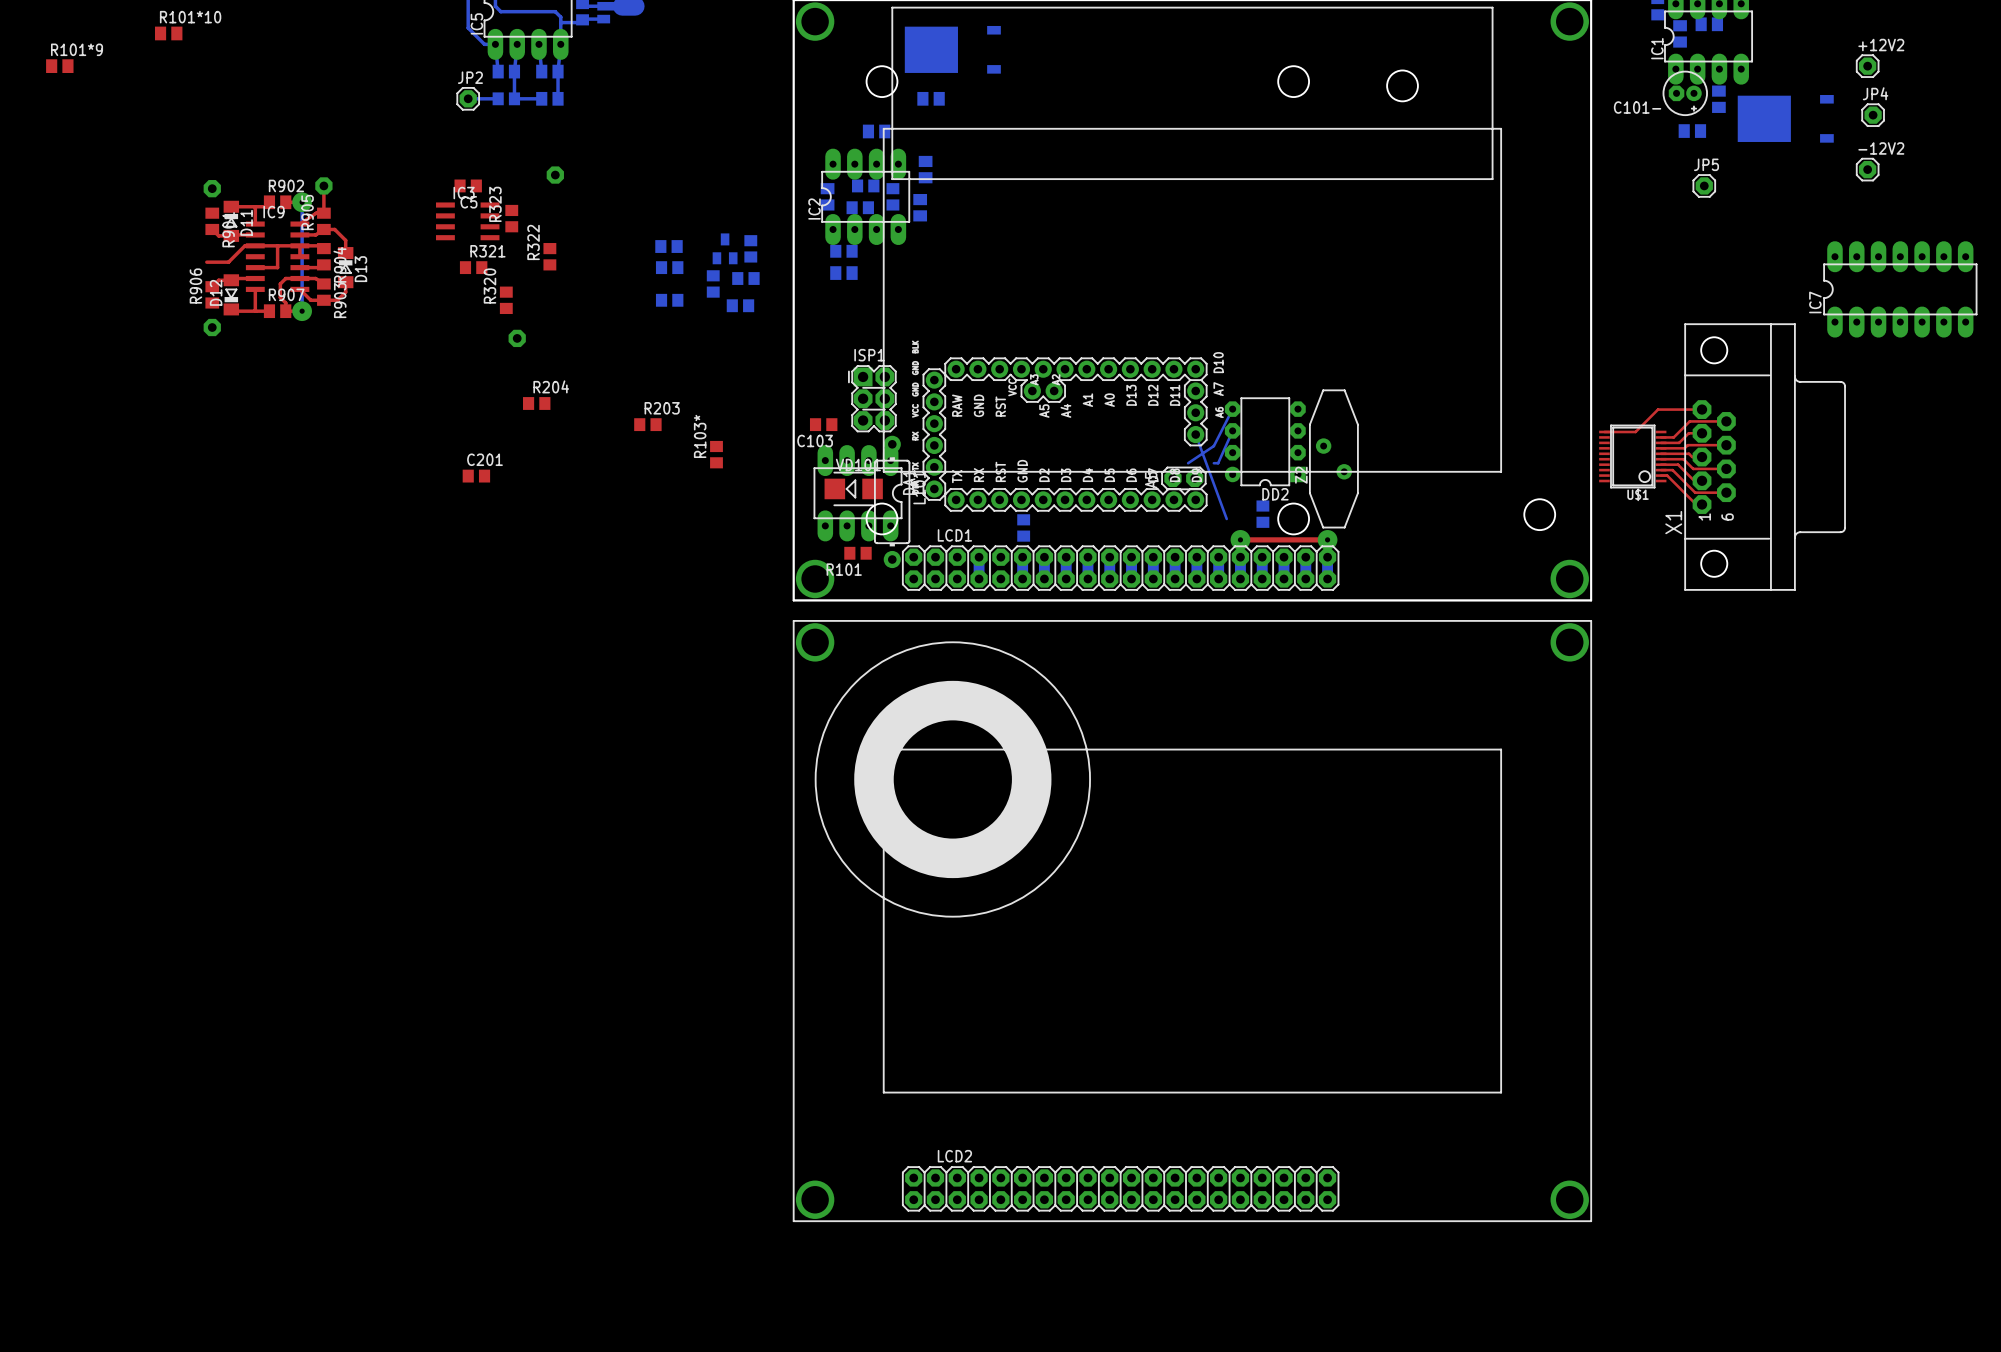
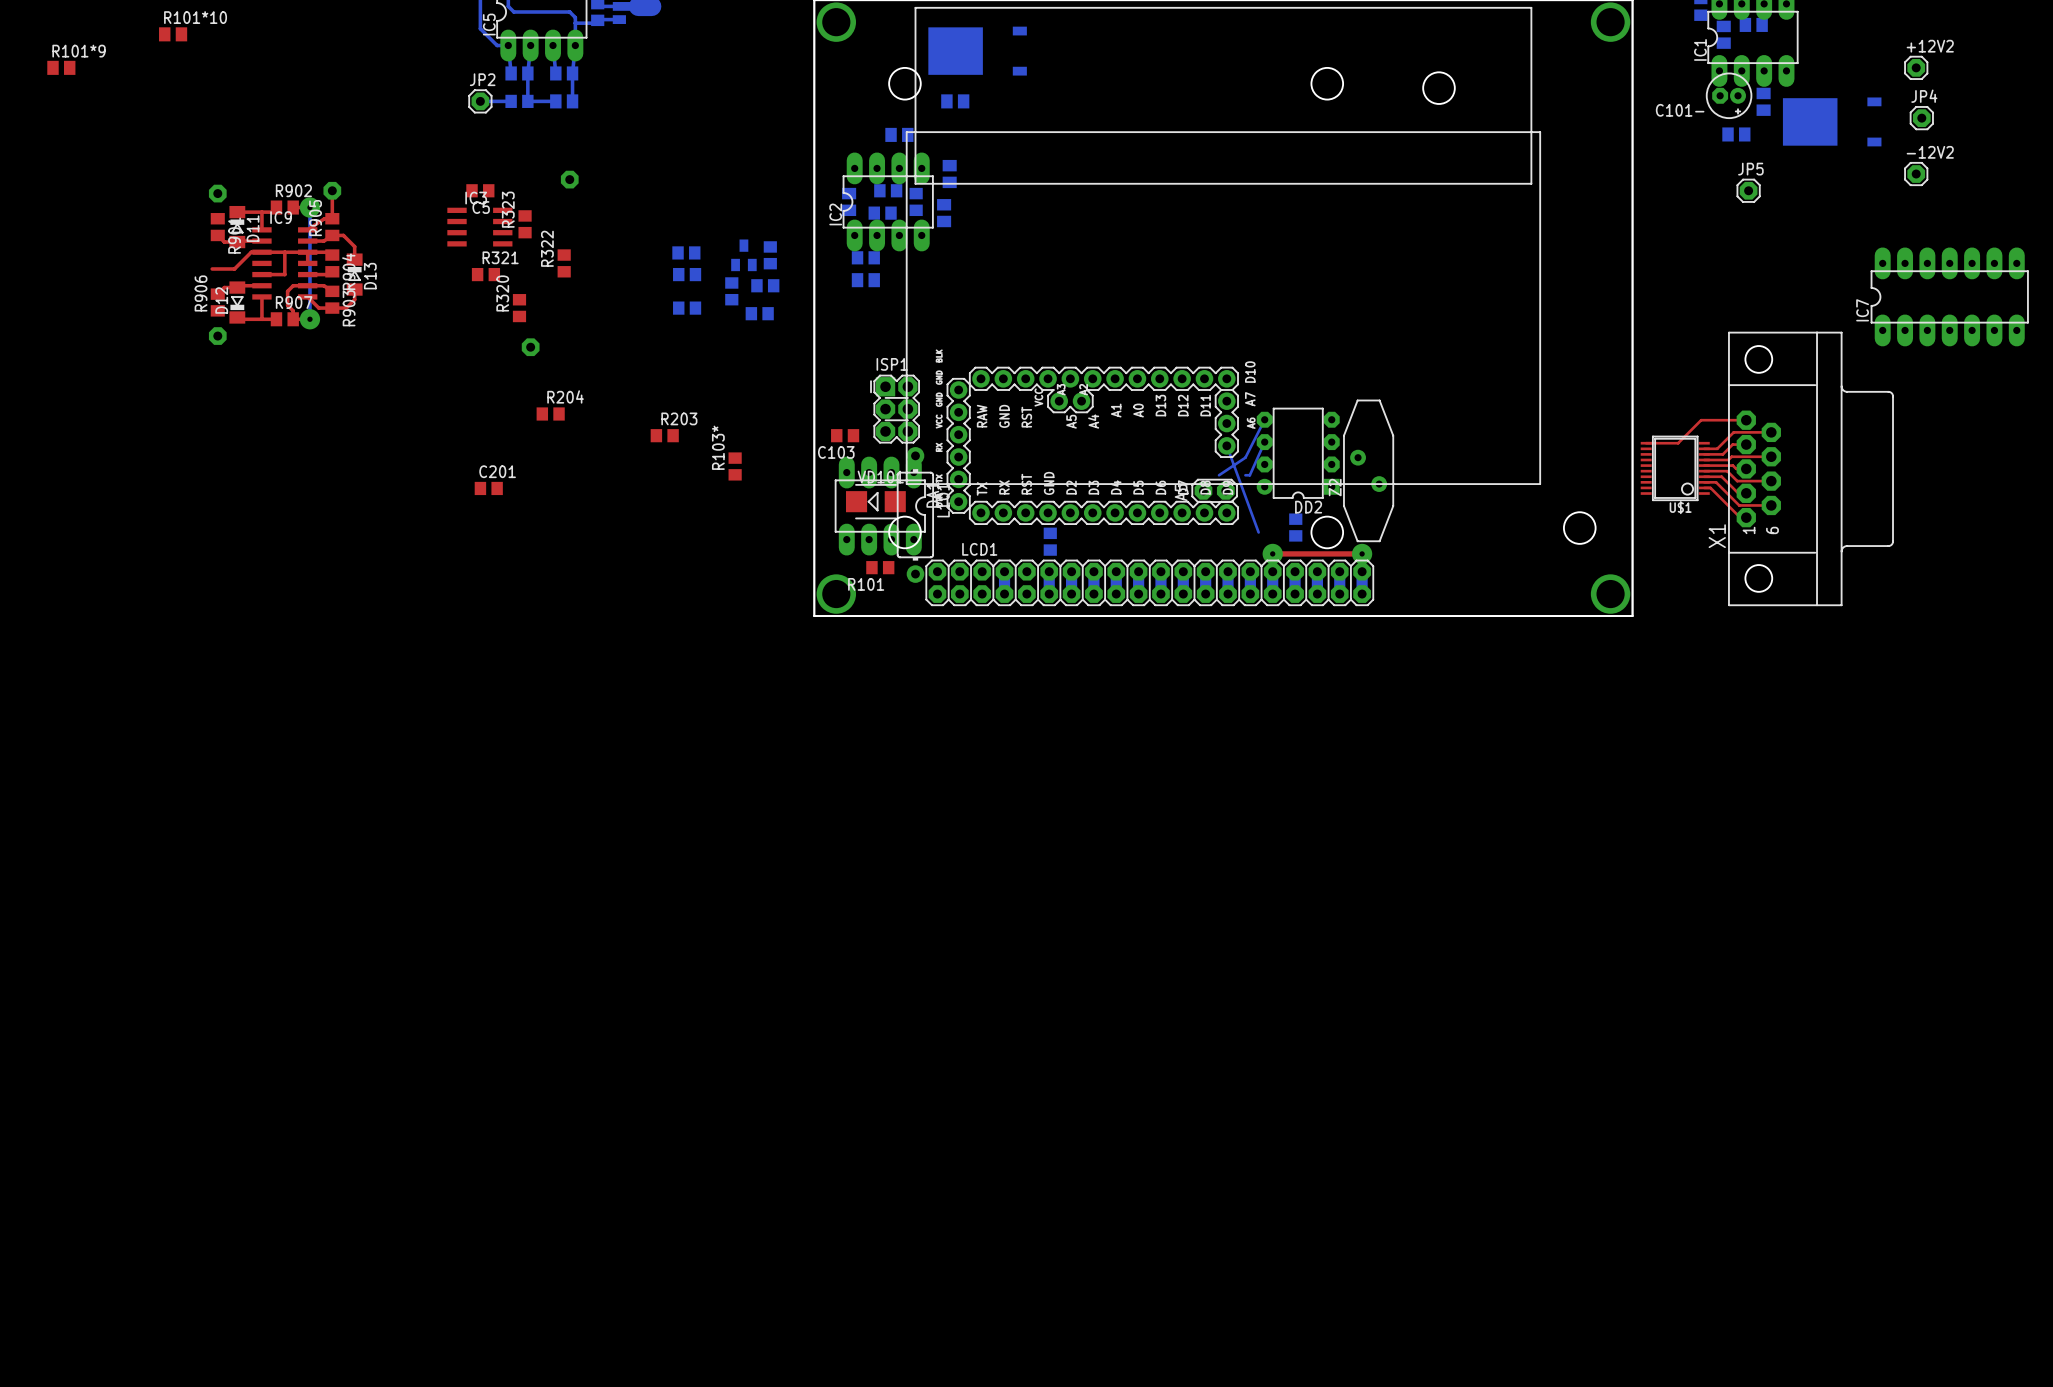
drawing: [815, 641, 1091, 918] -> none
LCD2: (1192, 921) -> none

